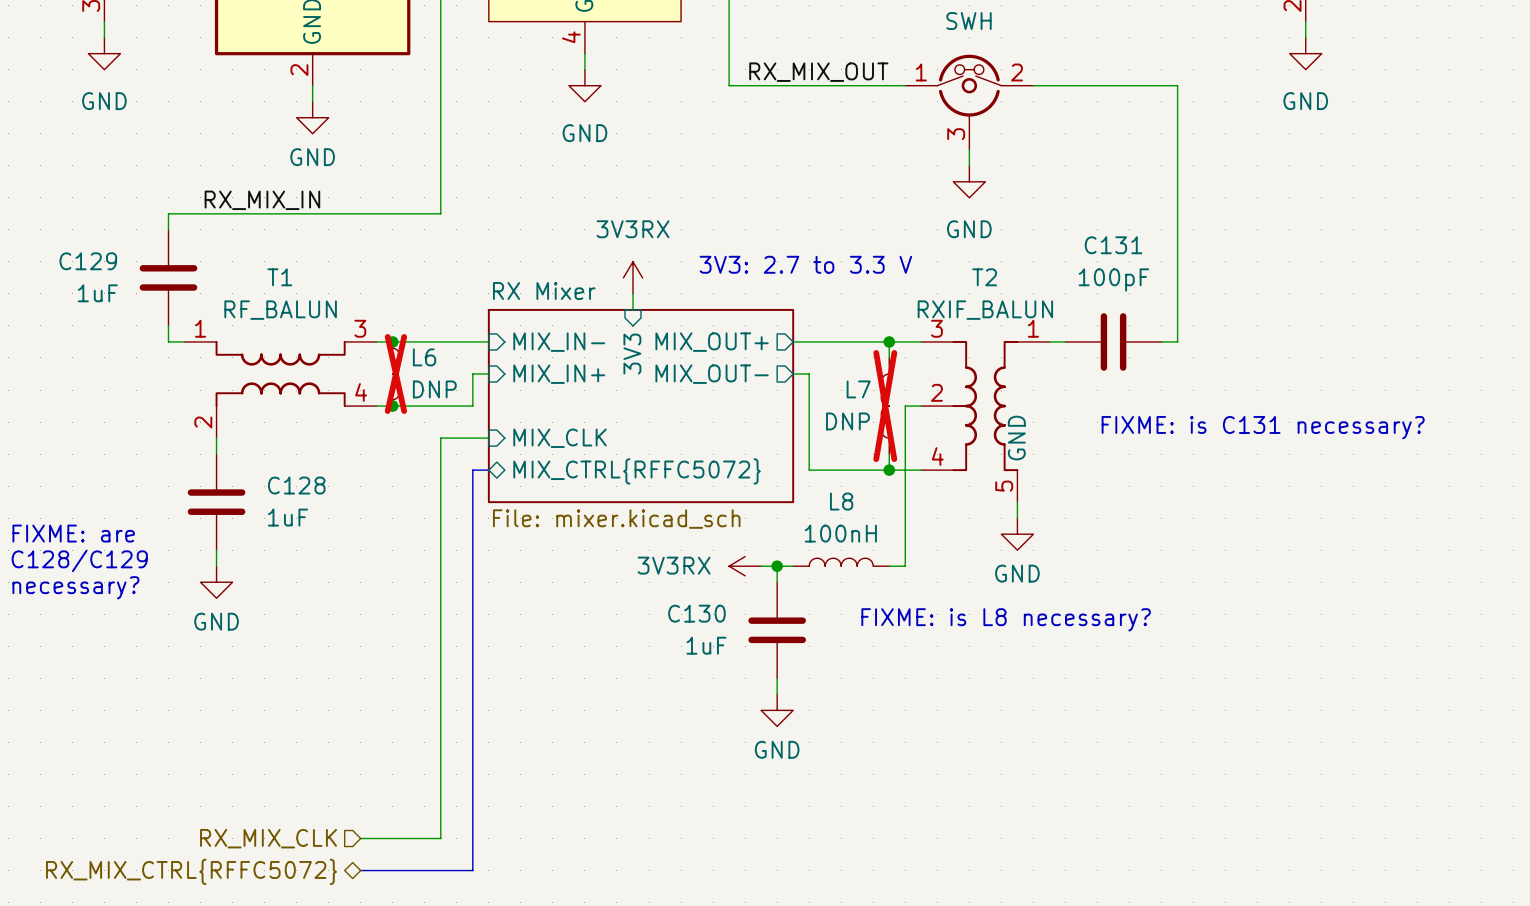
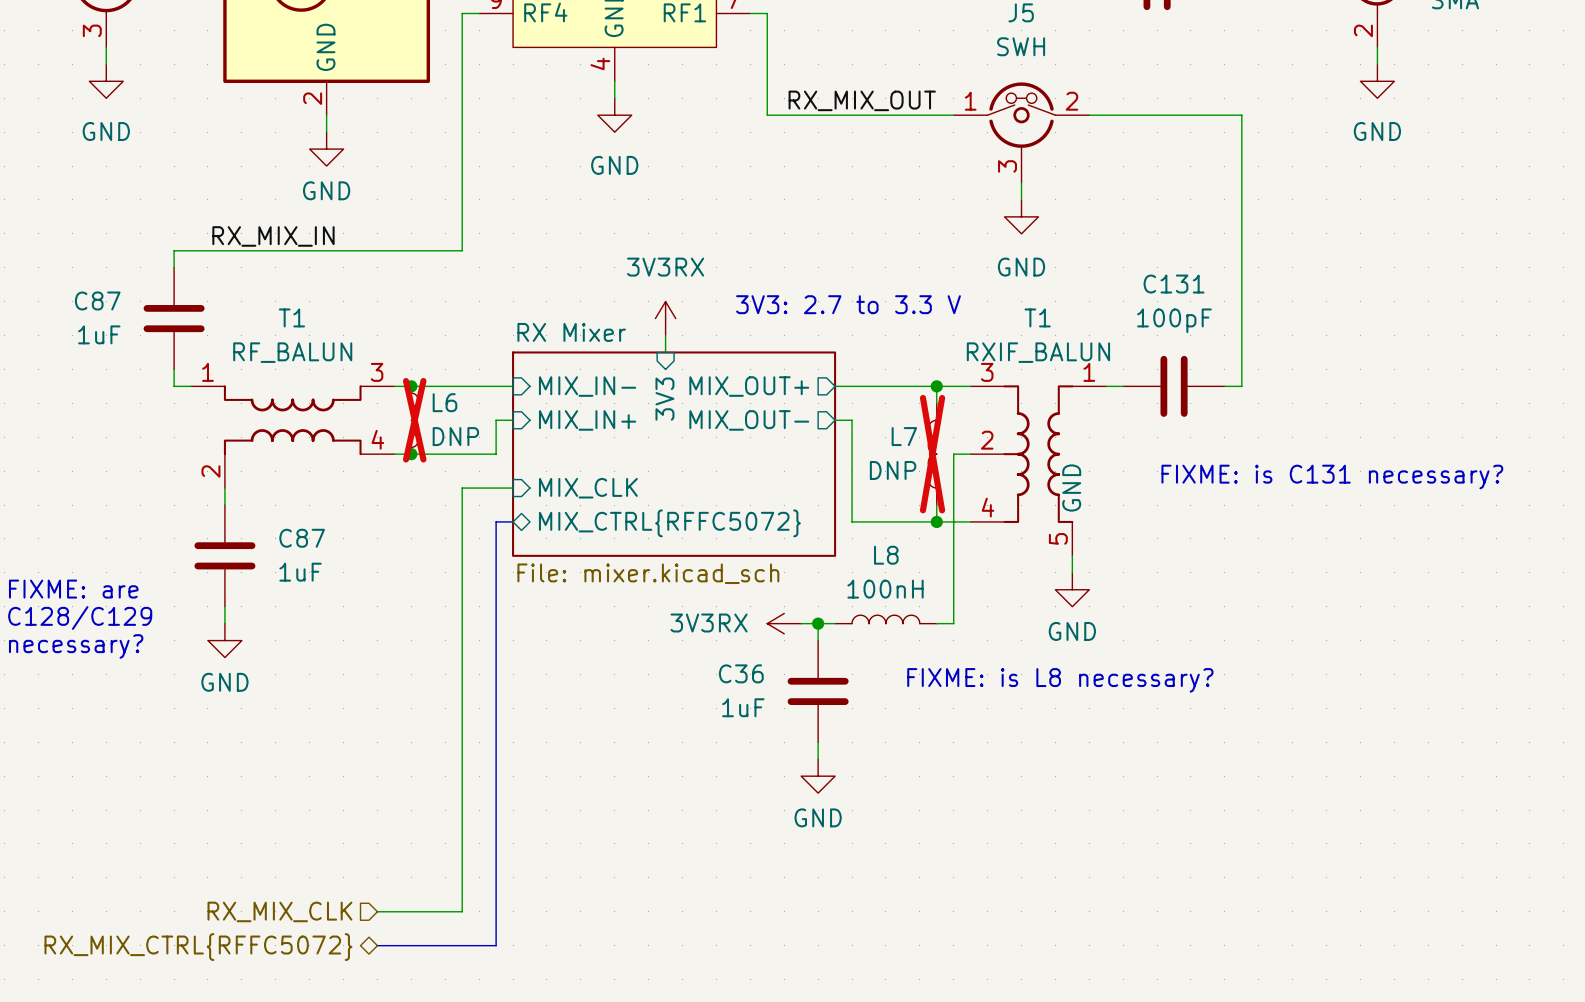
C129 name: C129 (88, 261) -> C87 (97, 300)
T2 name: T2 (984, 277) -> T1 (1037, 317)
C128 name: C128 (296, 485) -> C87 (302, 538)
C130 name: C130 (696, 613) -> C36 (741, 673)

